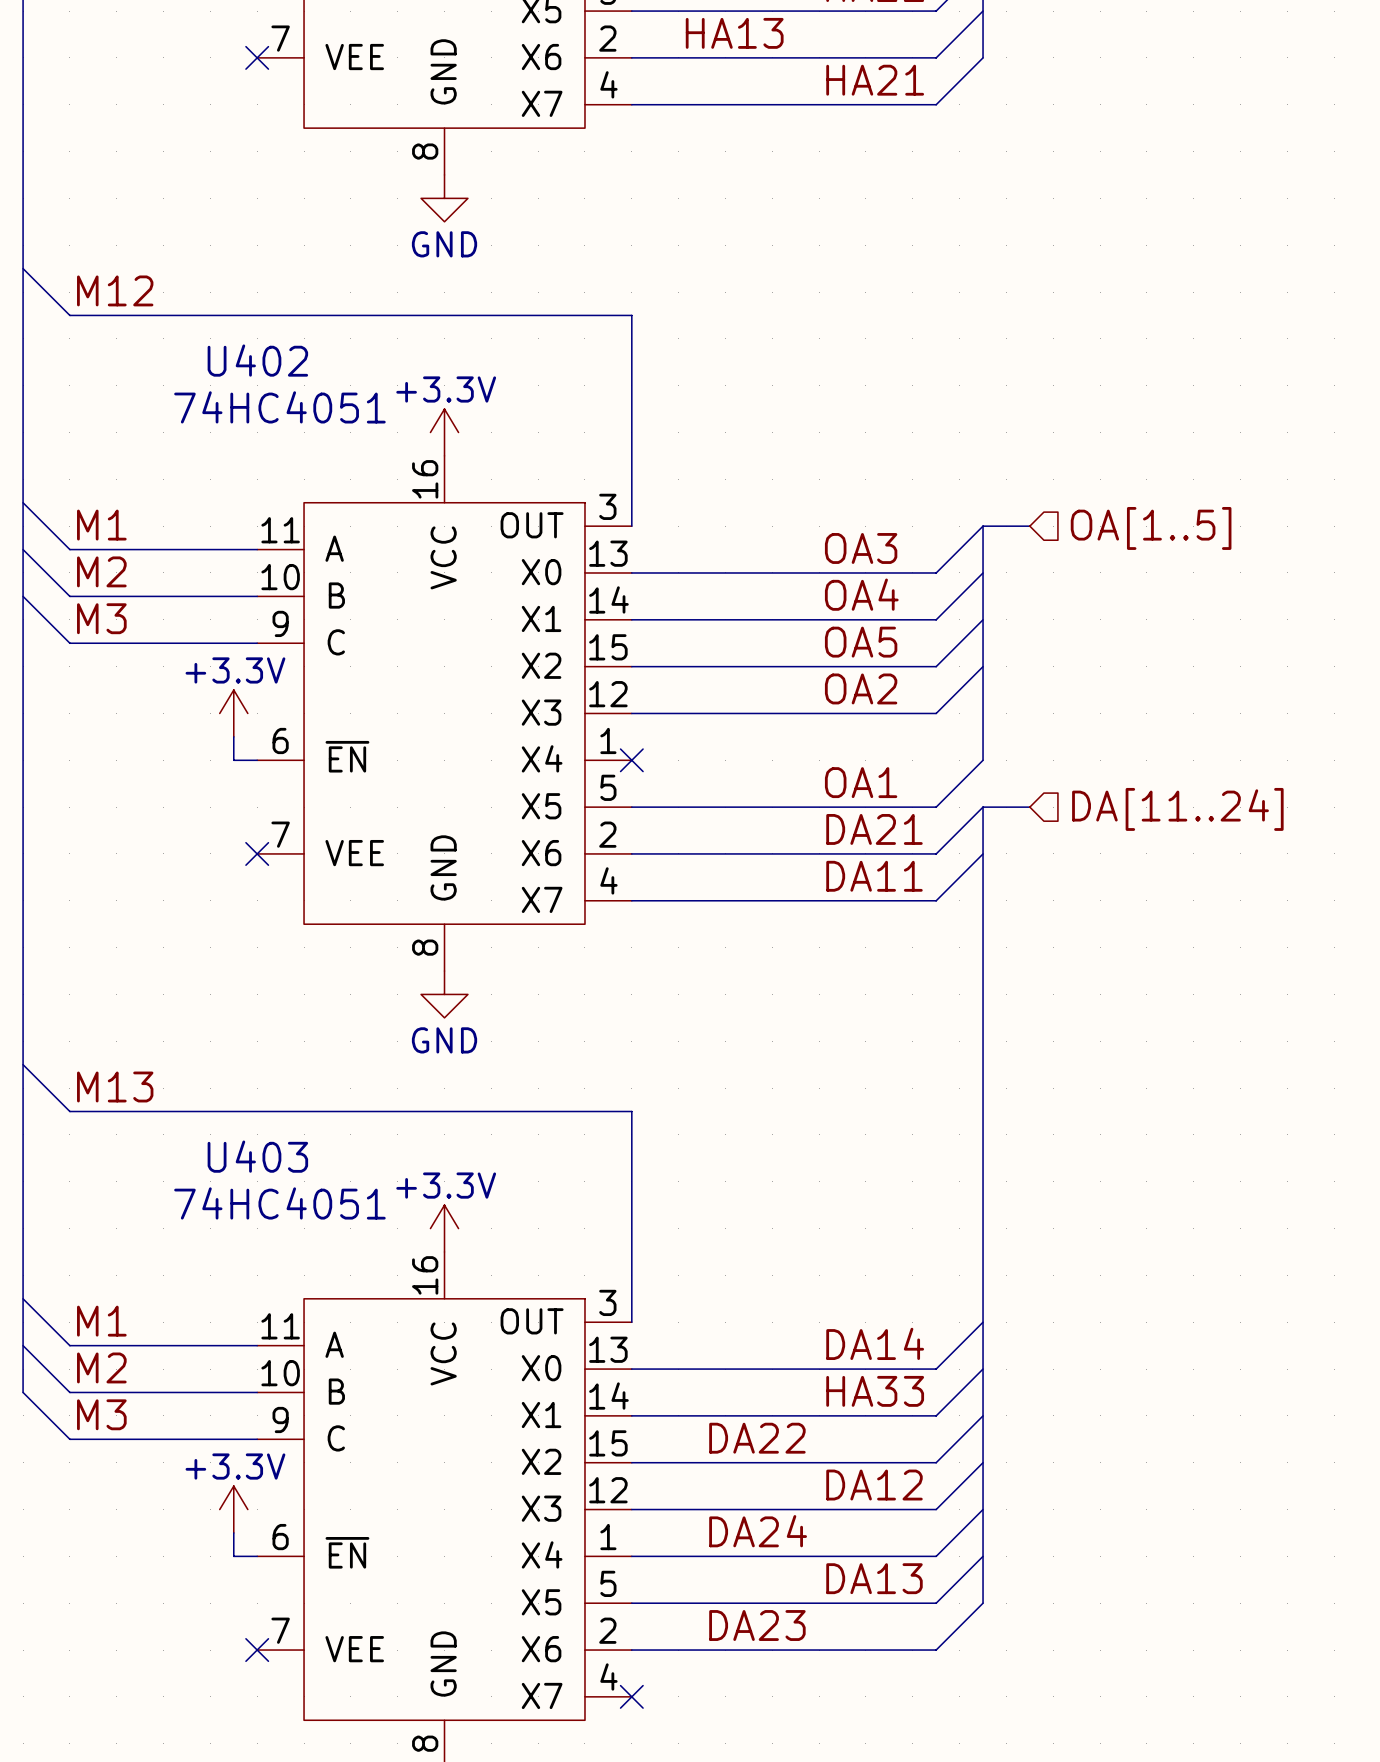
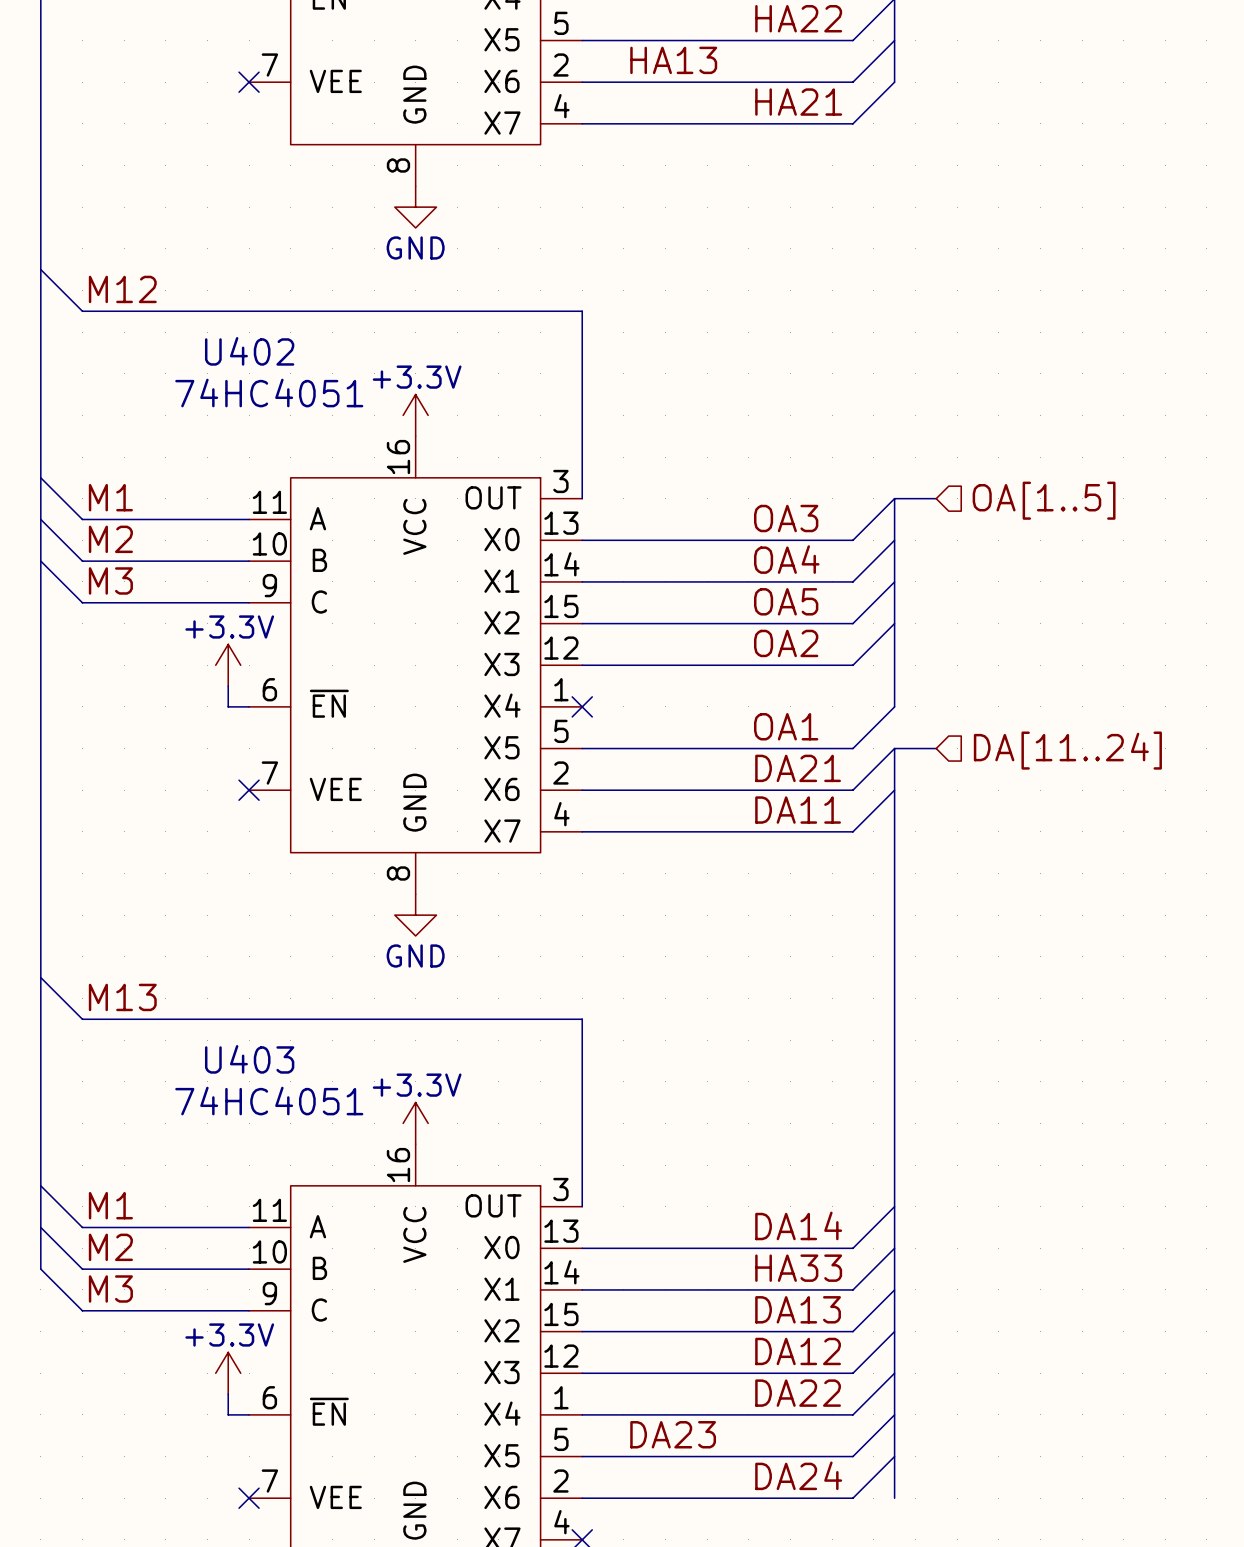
label position: DA22 (757, 1438) -> DA22 (798, 1393)
label position: DA24 (758, 1531) -> DA24 (798, 1475)
label position: DA13 (874, 1578) -> DA13 (798, 1309)
bus: none -> (894, 1456) (894, 1498)
label position: DA23 (757, 1625) -> DA23 (673, 1434)

